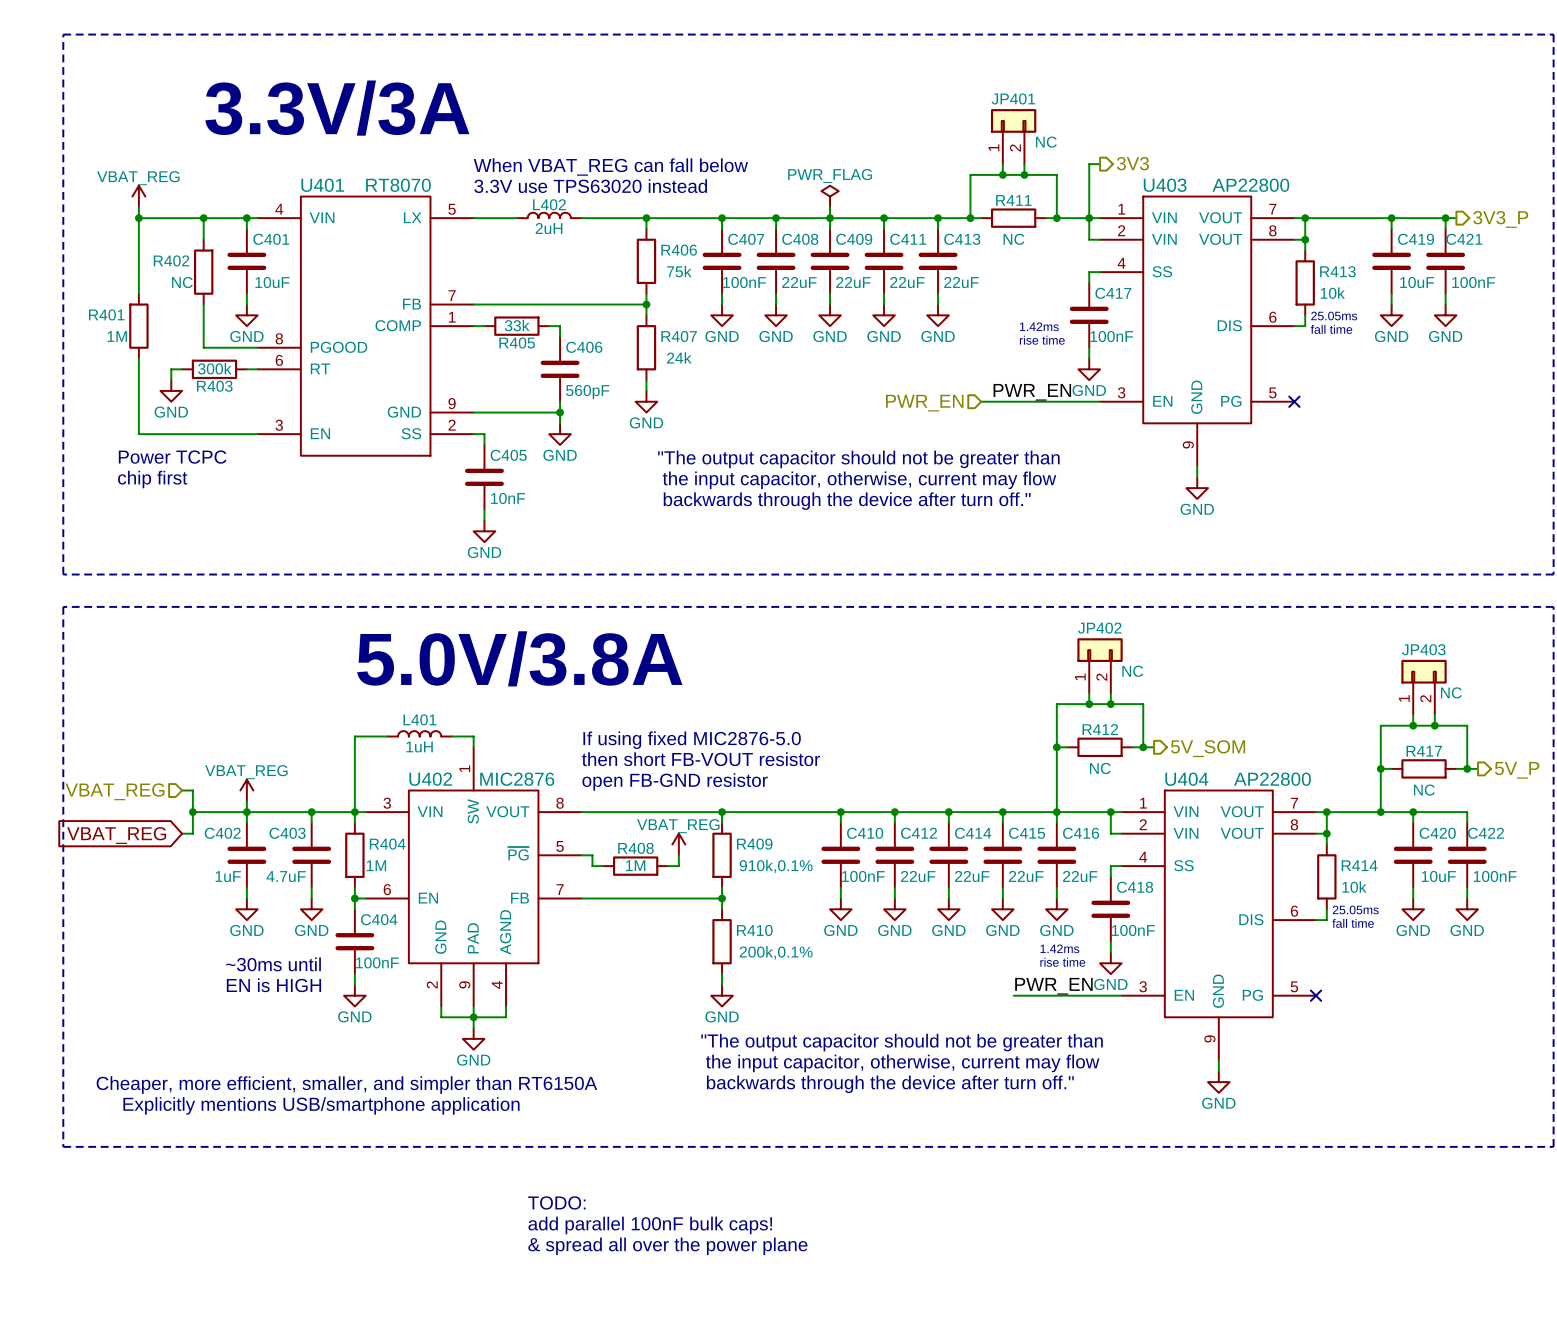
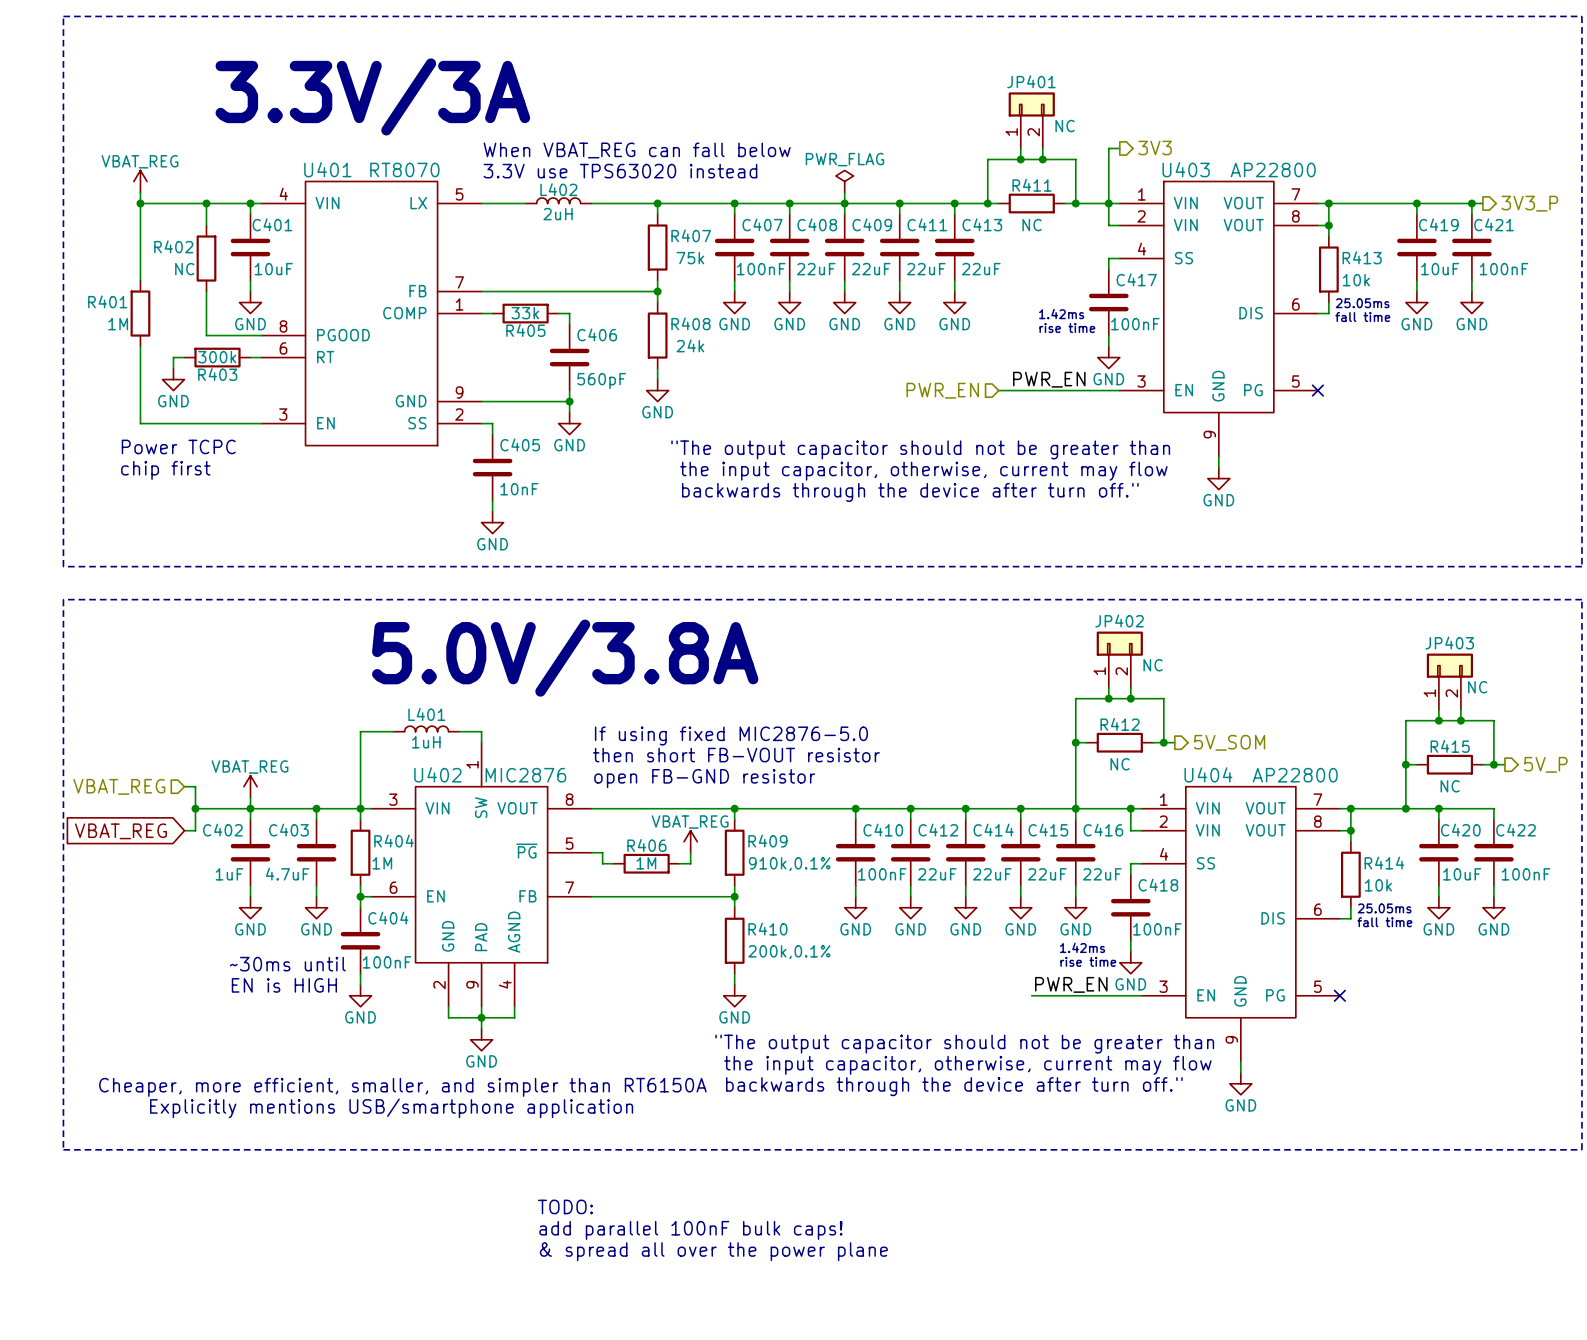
R406 name: R406 (679, 250) -> R407 (691, 235)
R407 name: R407 (679, 336) -> R408 (690, 323)
R417 name: R417 (1424, 751) -> R415 (1450, 746)
R408 name: R408 (635, 848) -> R406 (646, 845)

